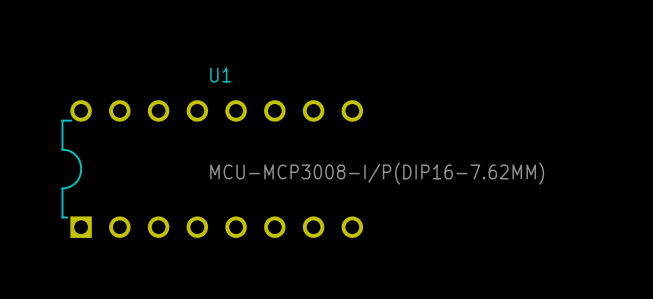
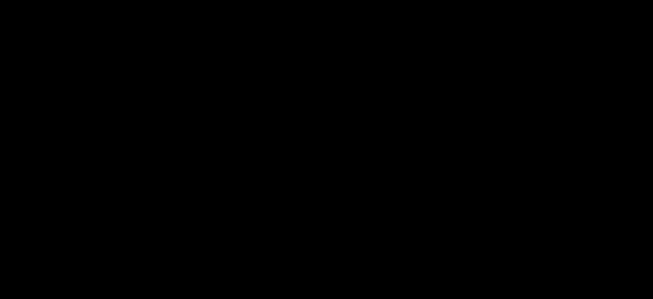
U1: MCU-MCP3008-I/P(DIP16-7.62MM) (212, 169) -> none

